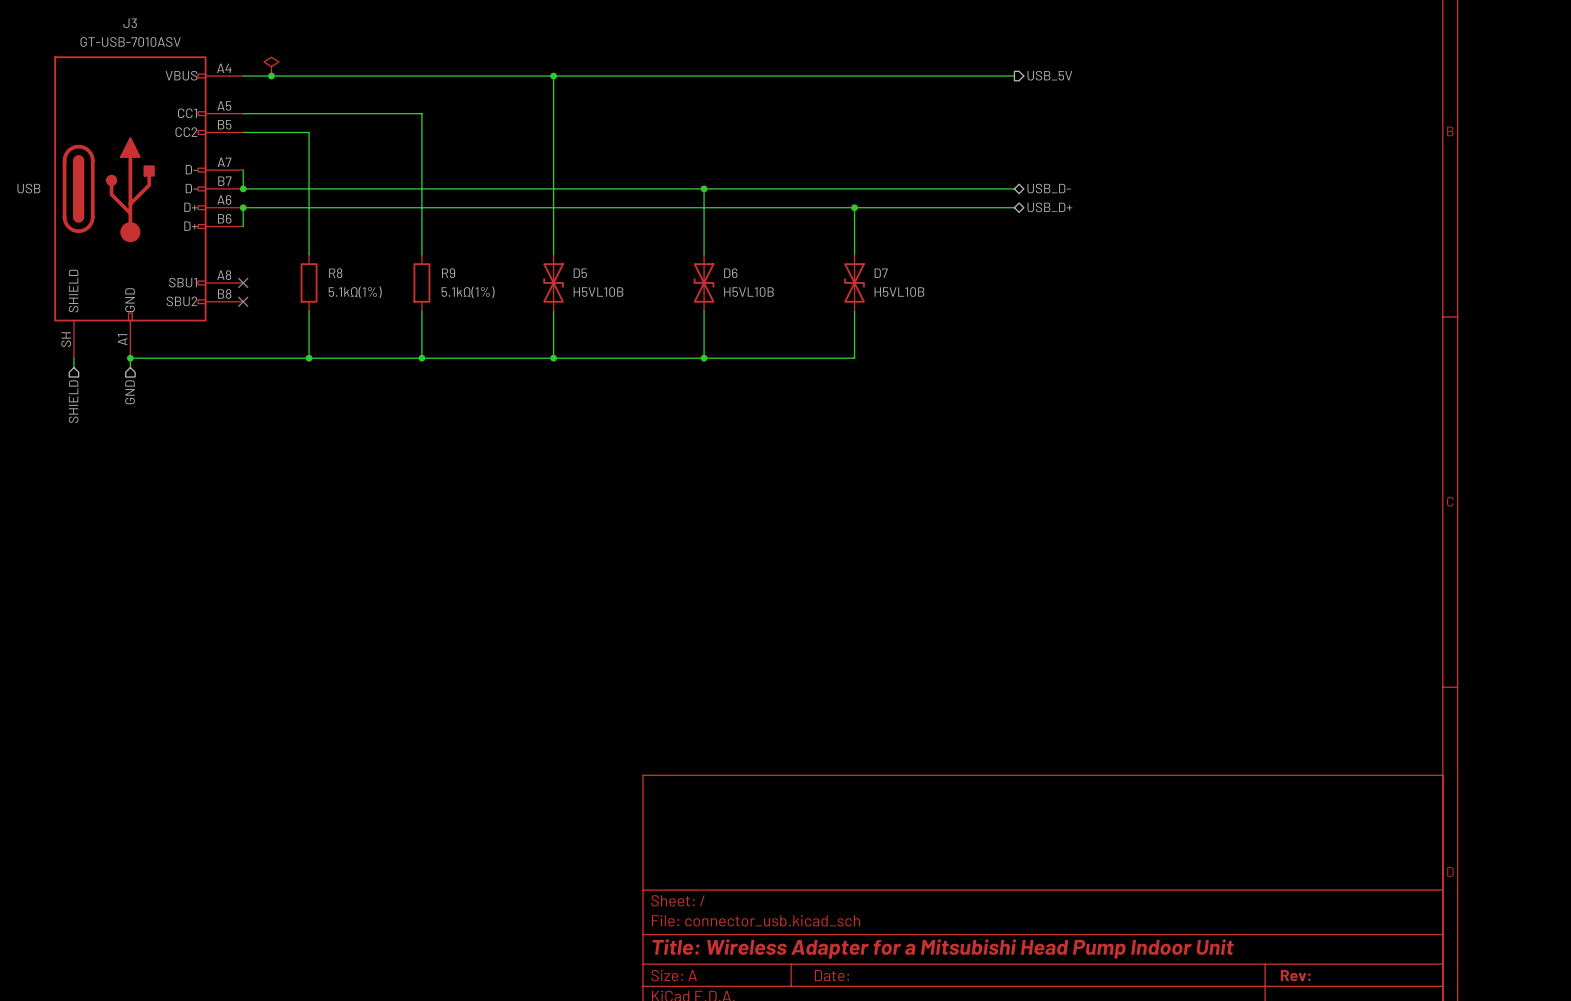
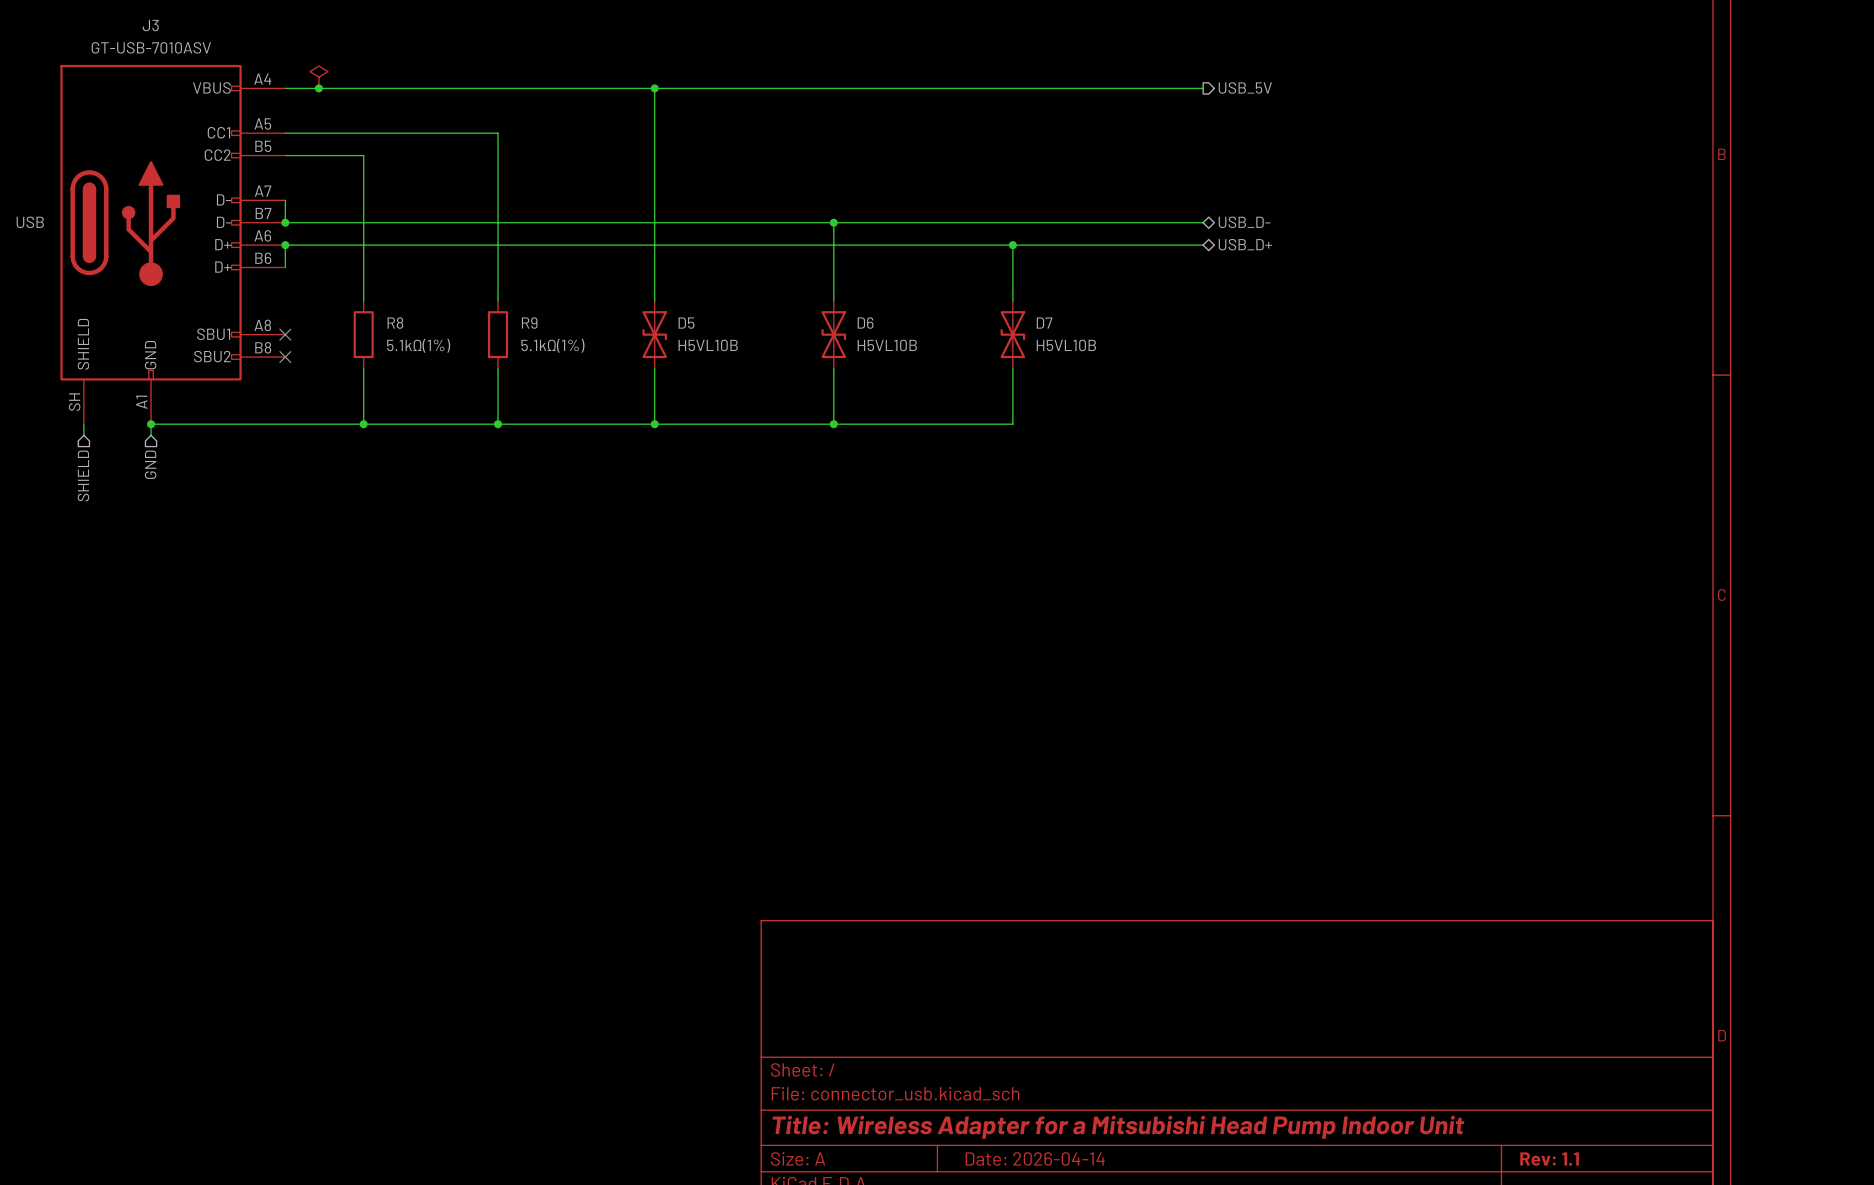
title block: Date: (831, 975) -> Date: 2026-04-14 (1035, 1158)
title block: Rev: (1295, 975) -> Rev: 1.1 (1549, 1159)

